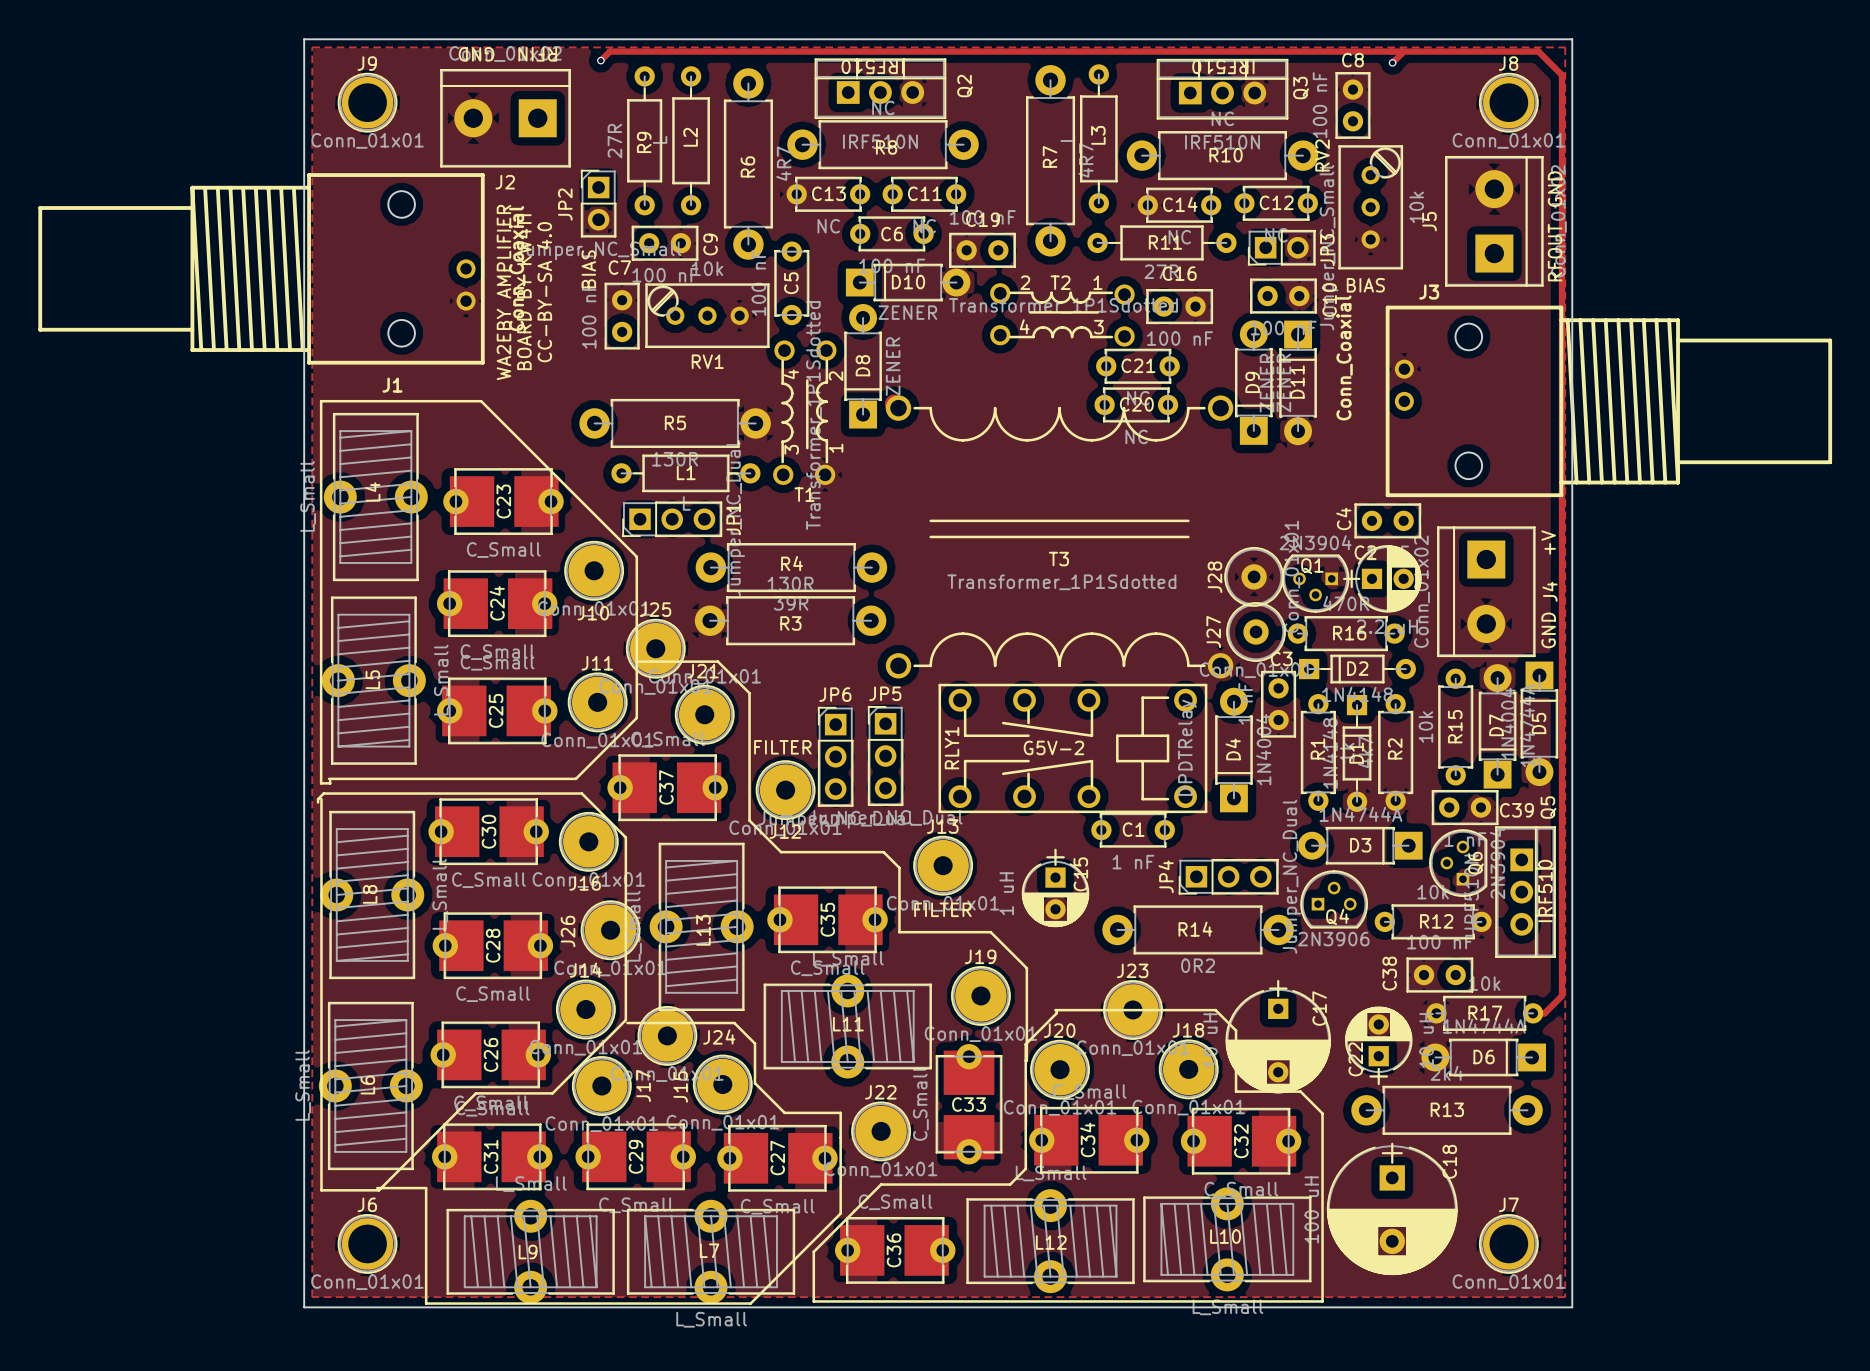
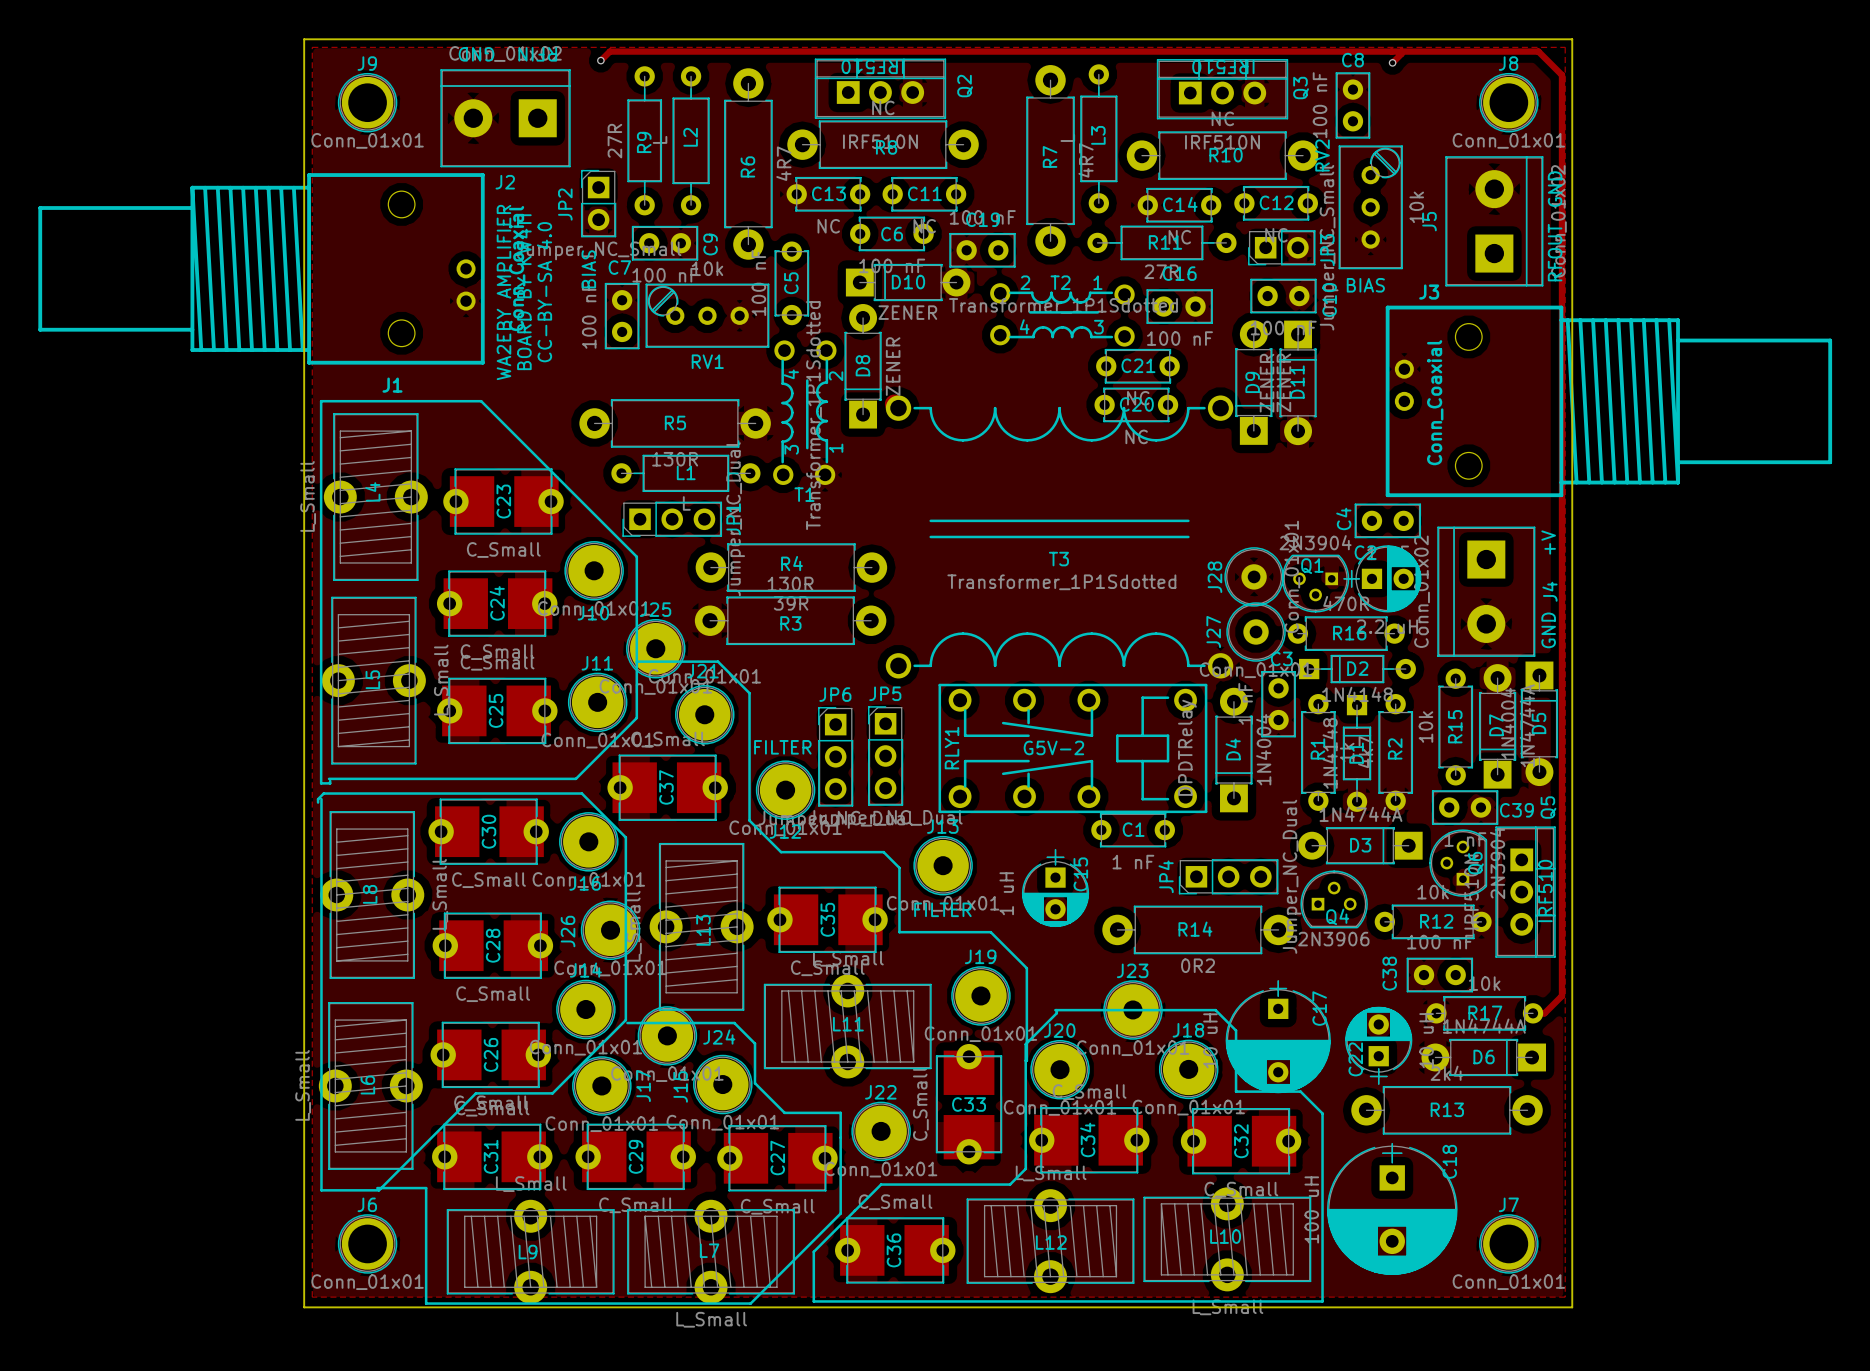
J3 value position: Conn_Coaxial (1344, 357) -> Conn_Coaxial (1435, 402)

